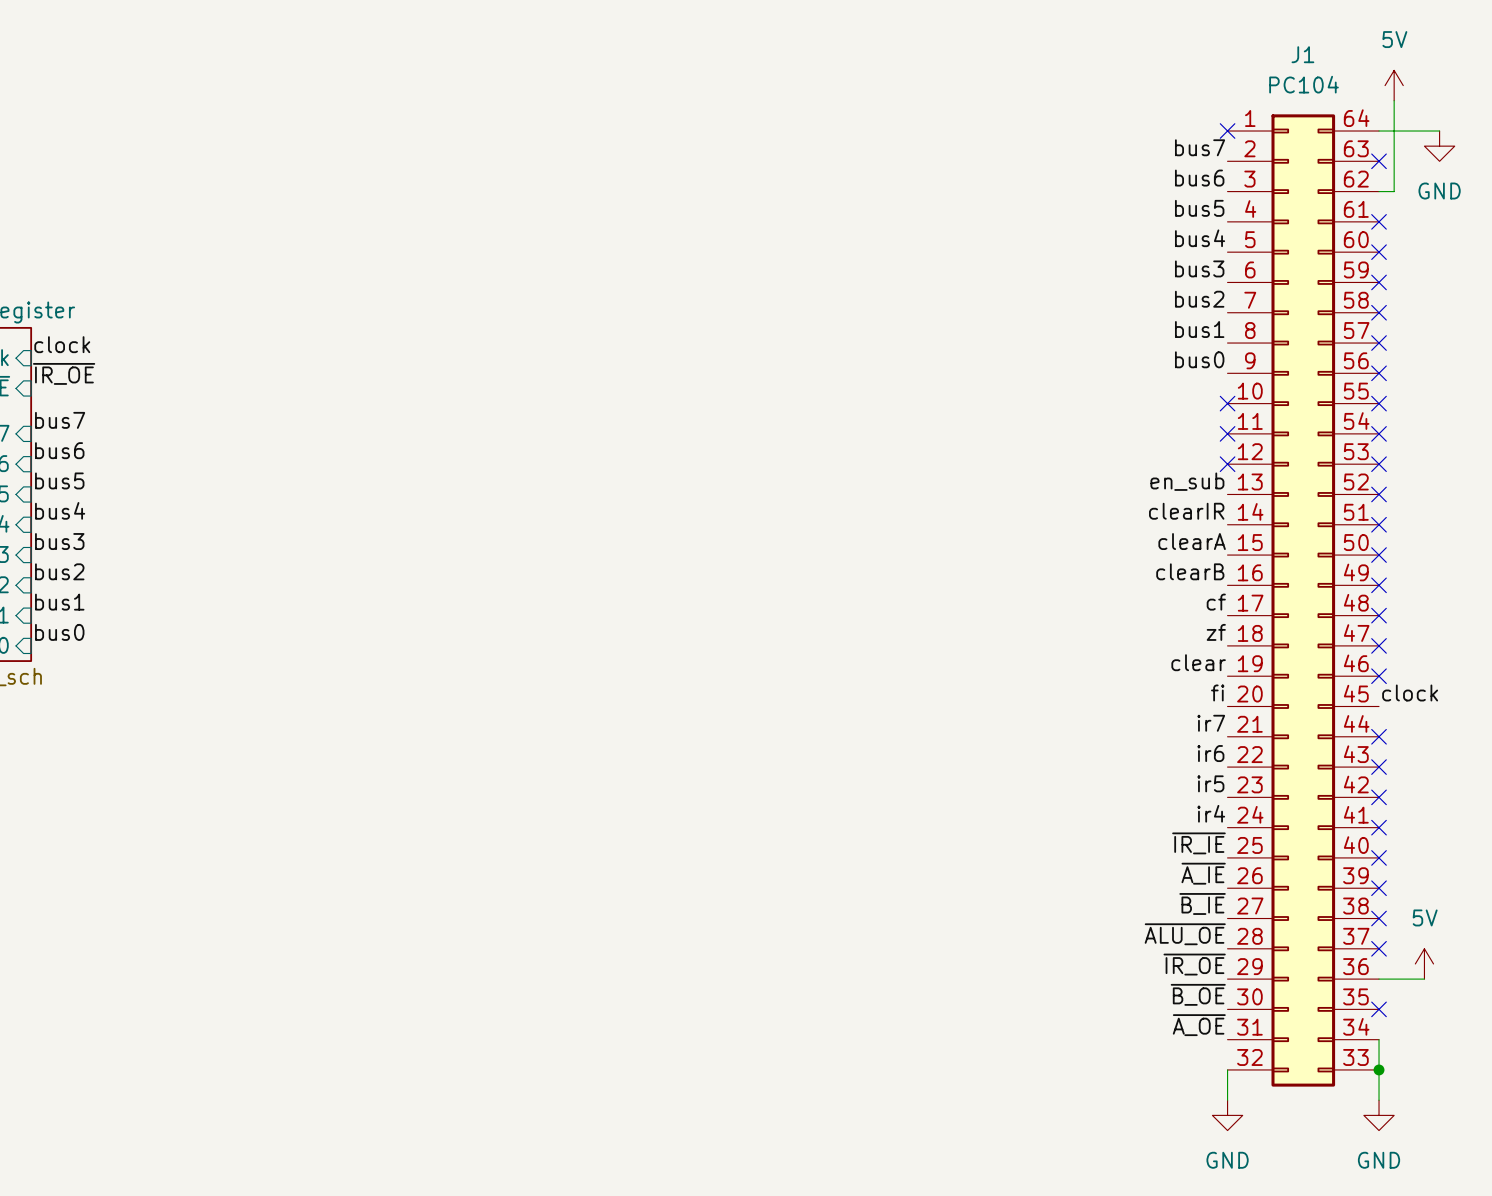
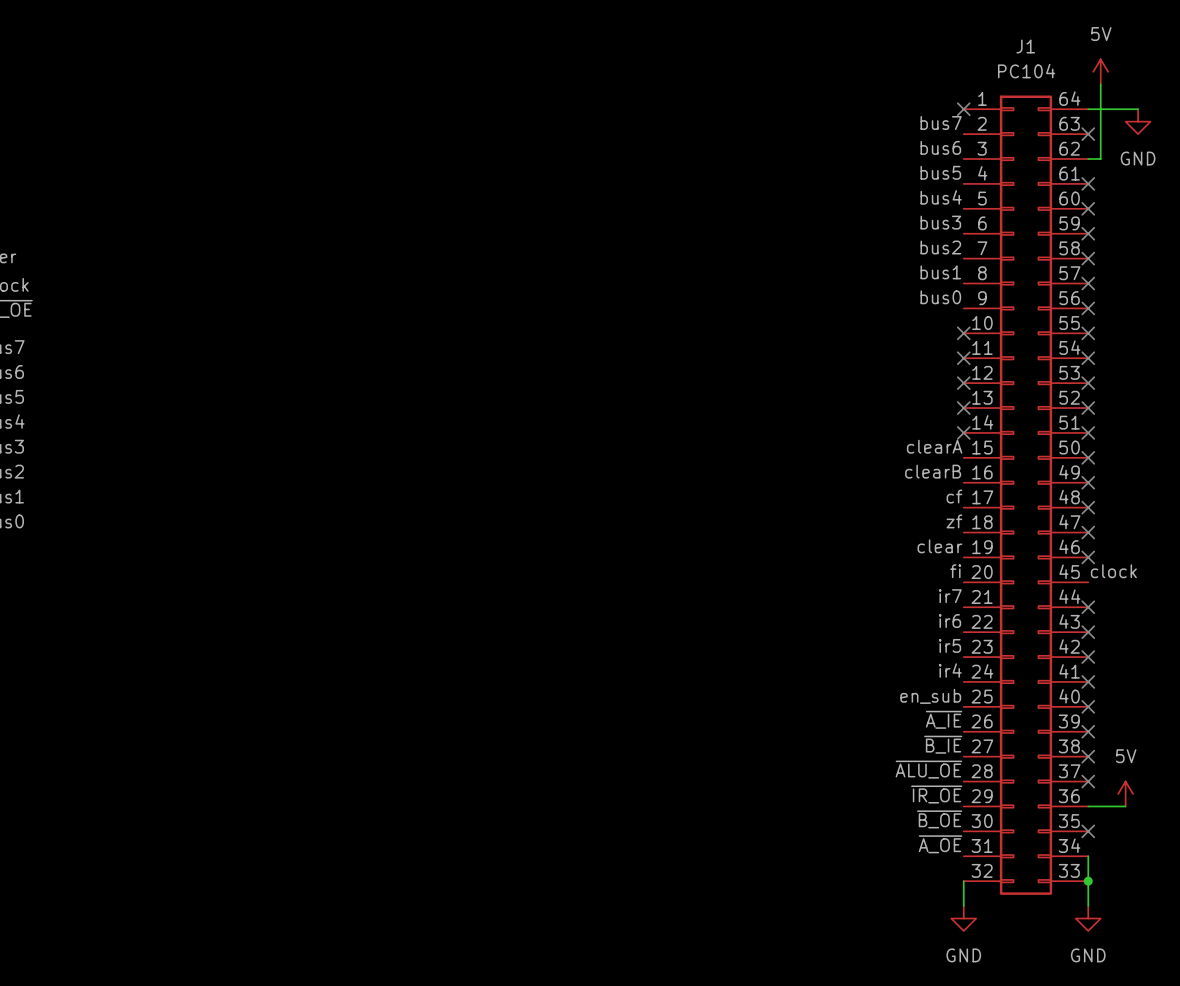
label: en_sub (1187, 481) -> none
no-connect mark: none -> (963, 408)
label: clearIR (1186, 511) -> none
no-connect mark: none -> (963, 432)
label: ~{IR_IE} (1198, 843) -> en_sub (930, 696)

